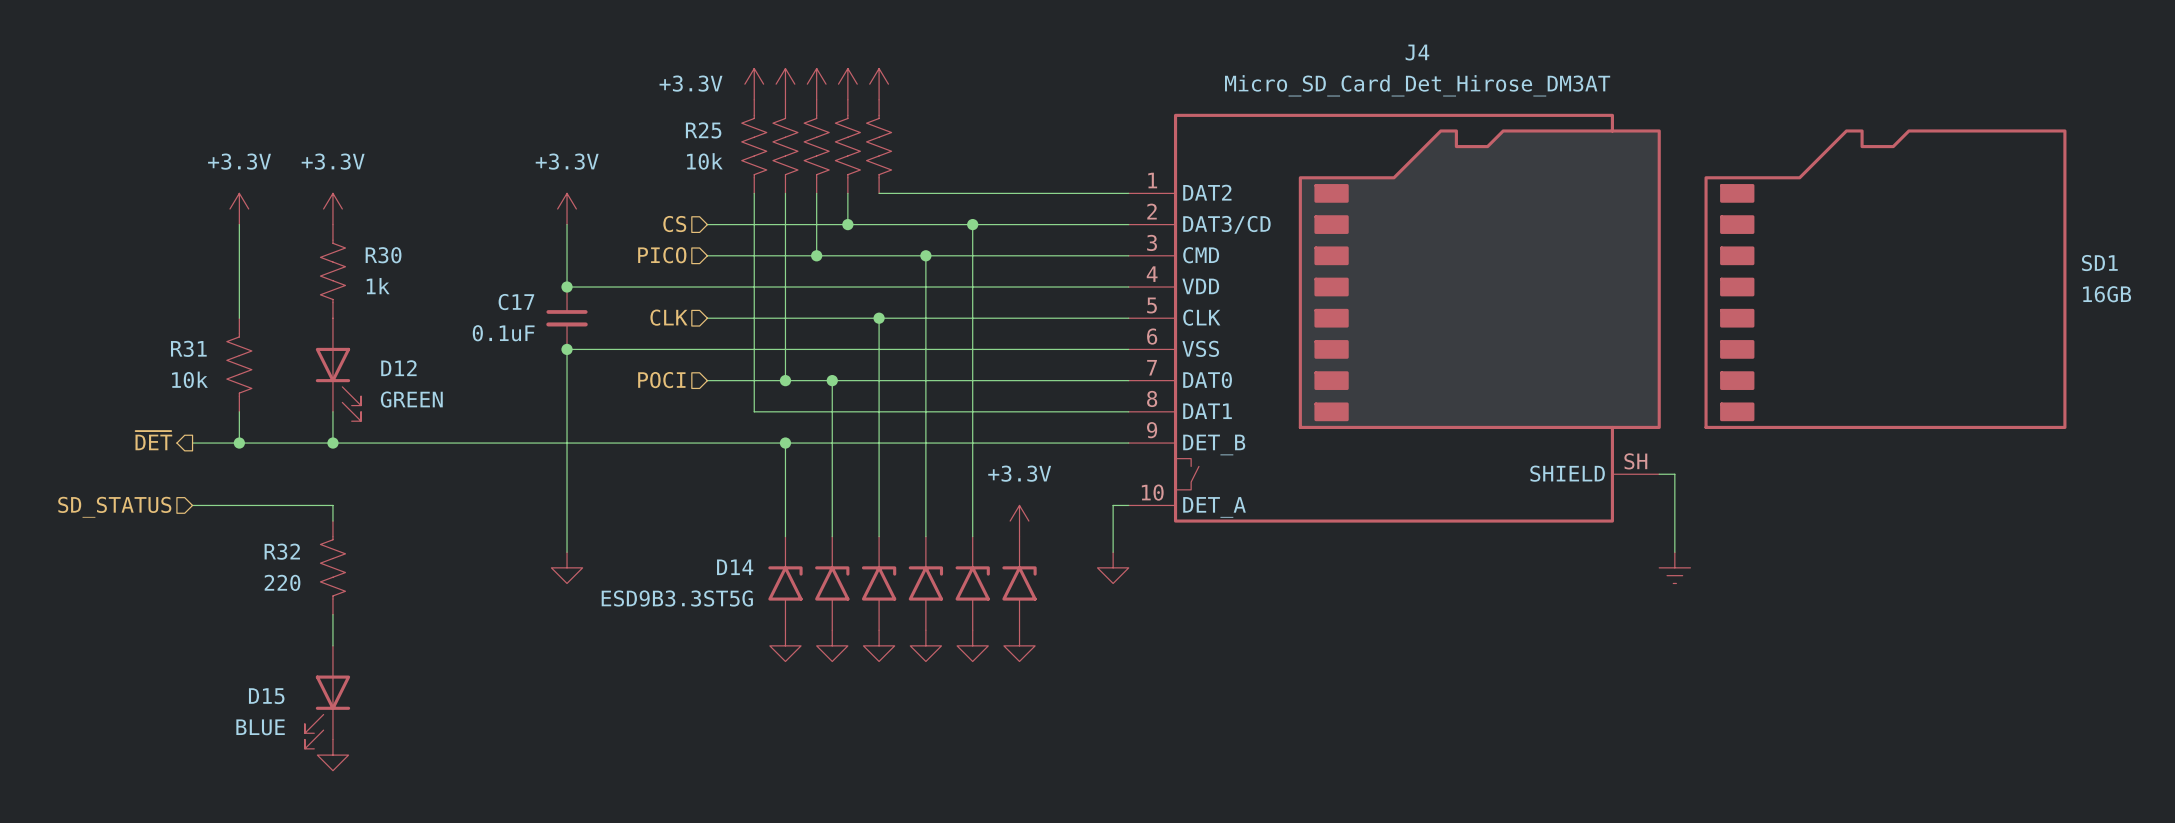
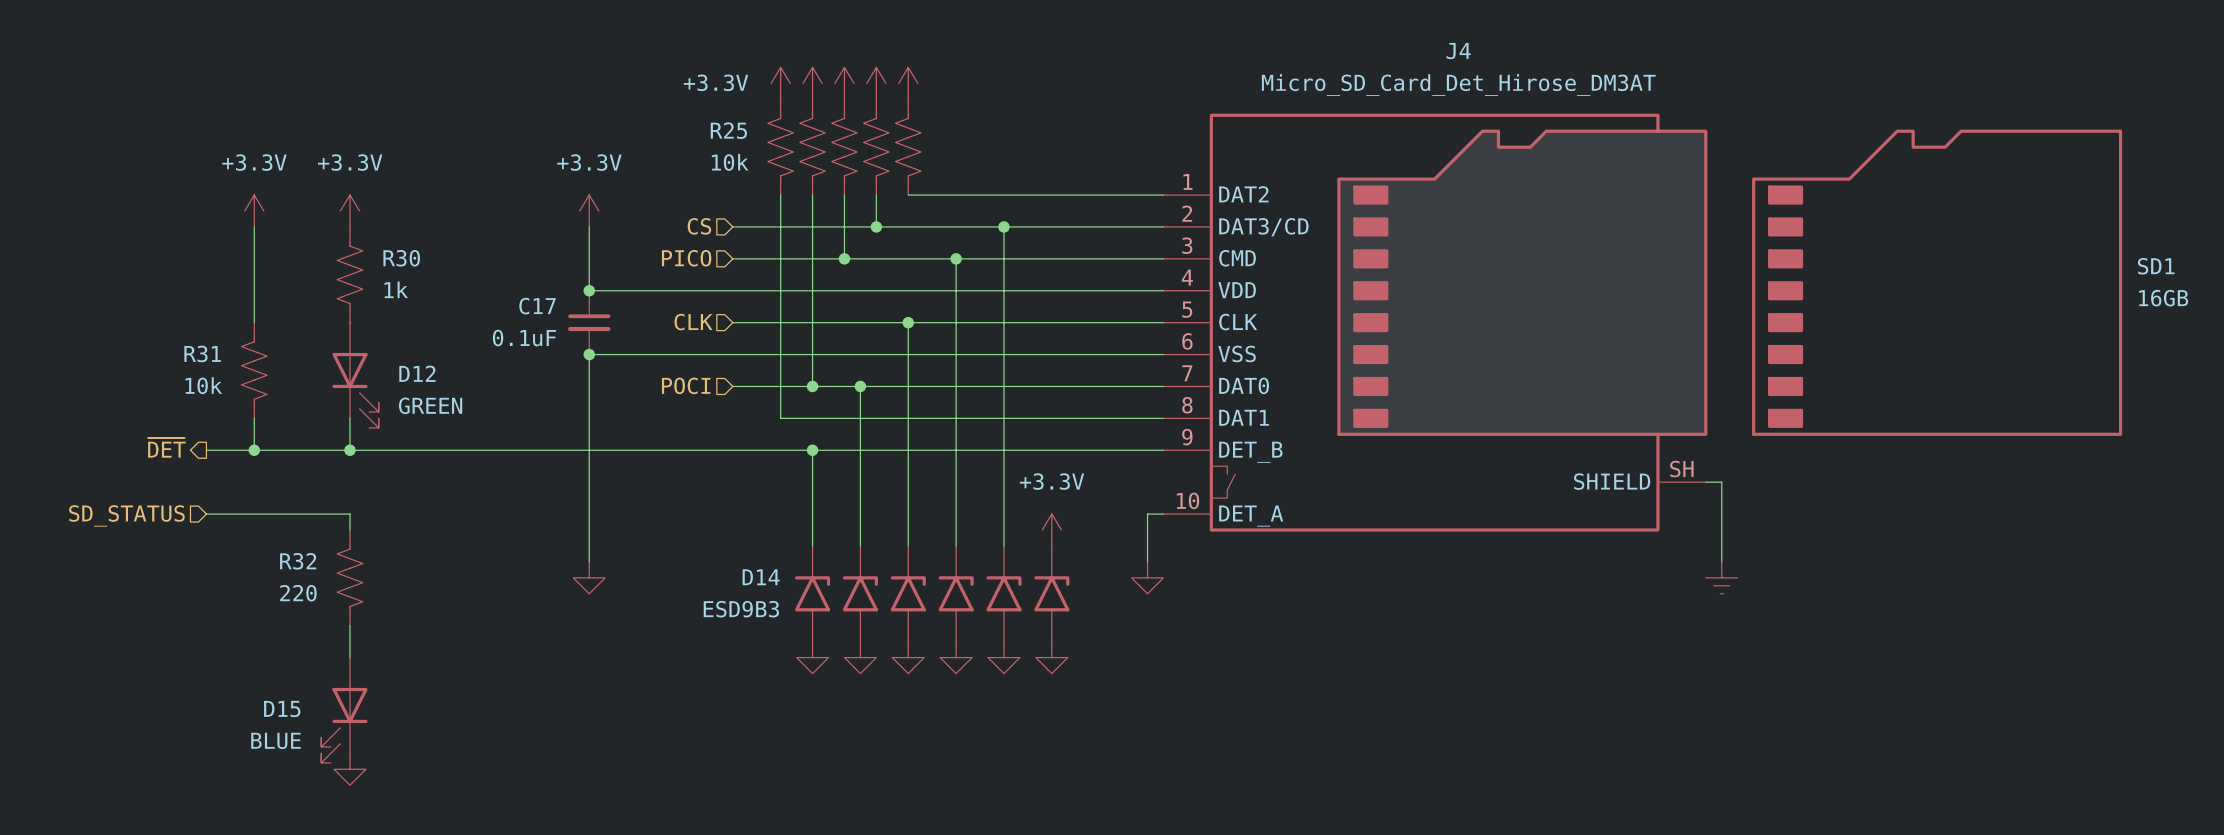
D14 value: ESD9B3.3ST5G (677, 598) -> ESD9B3 (741, 609)

